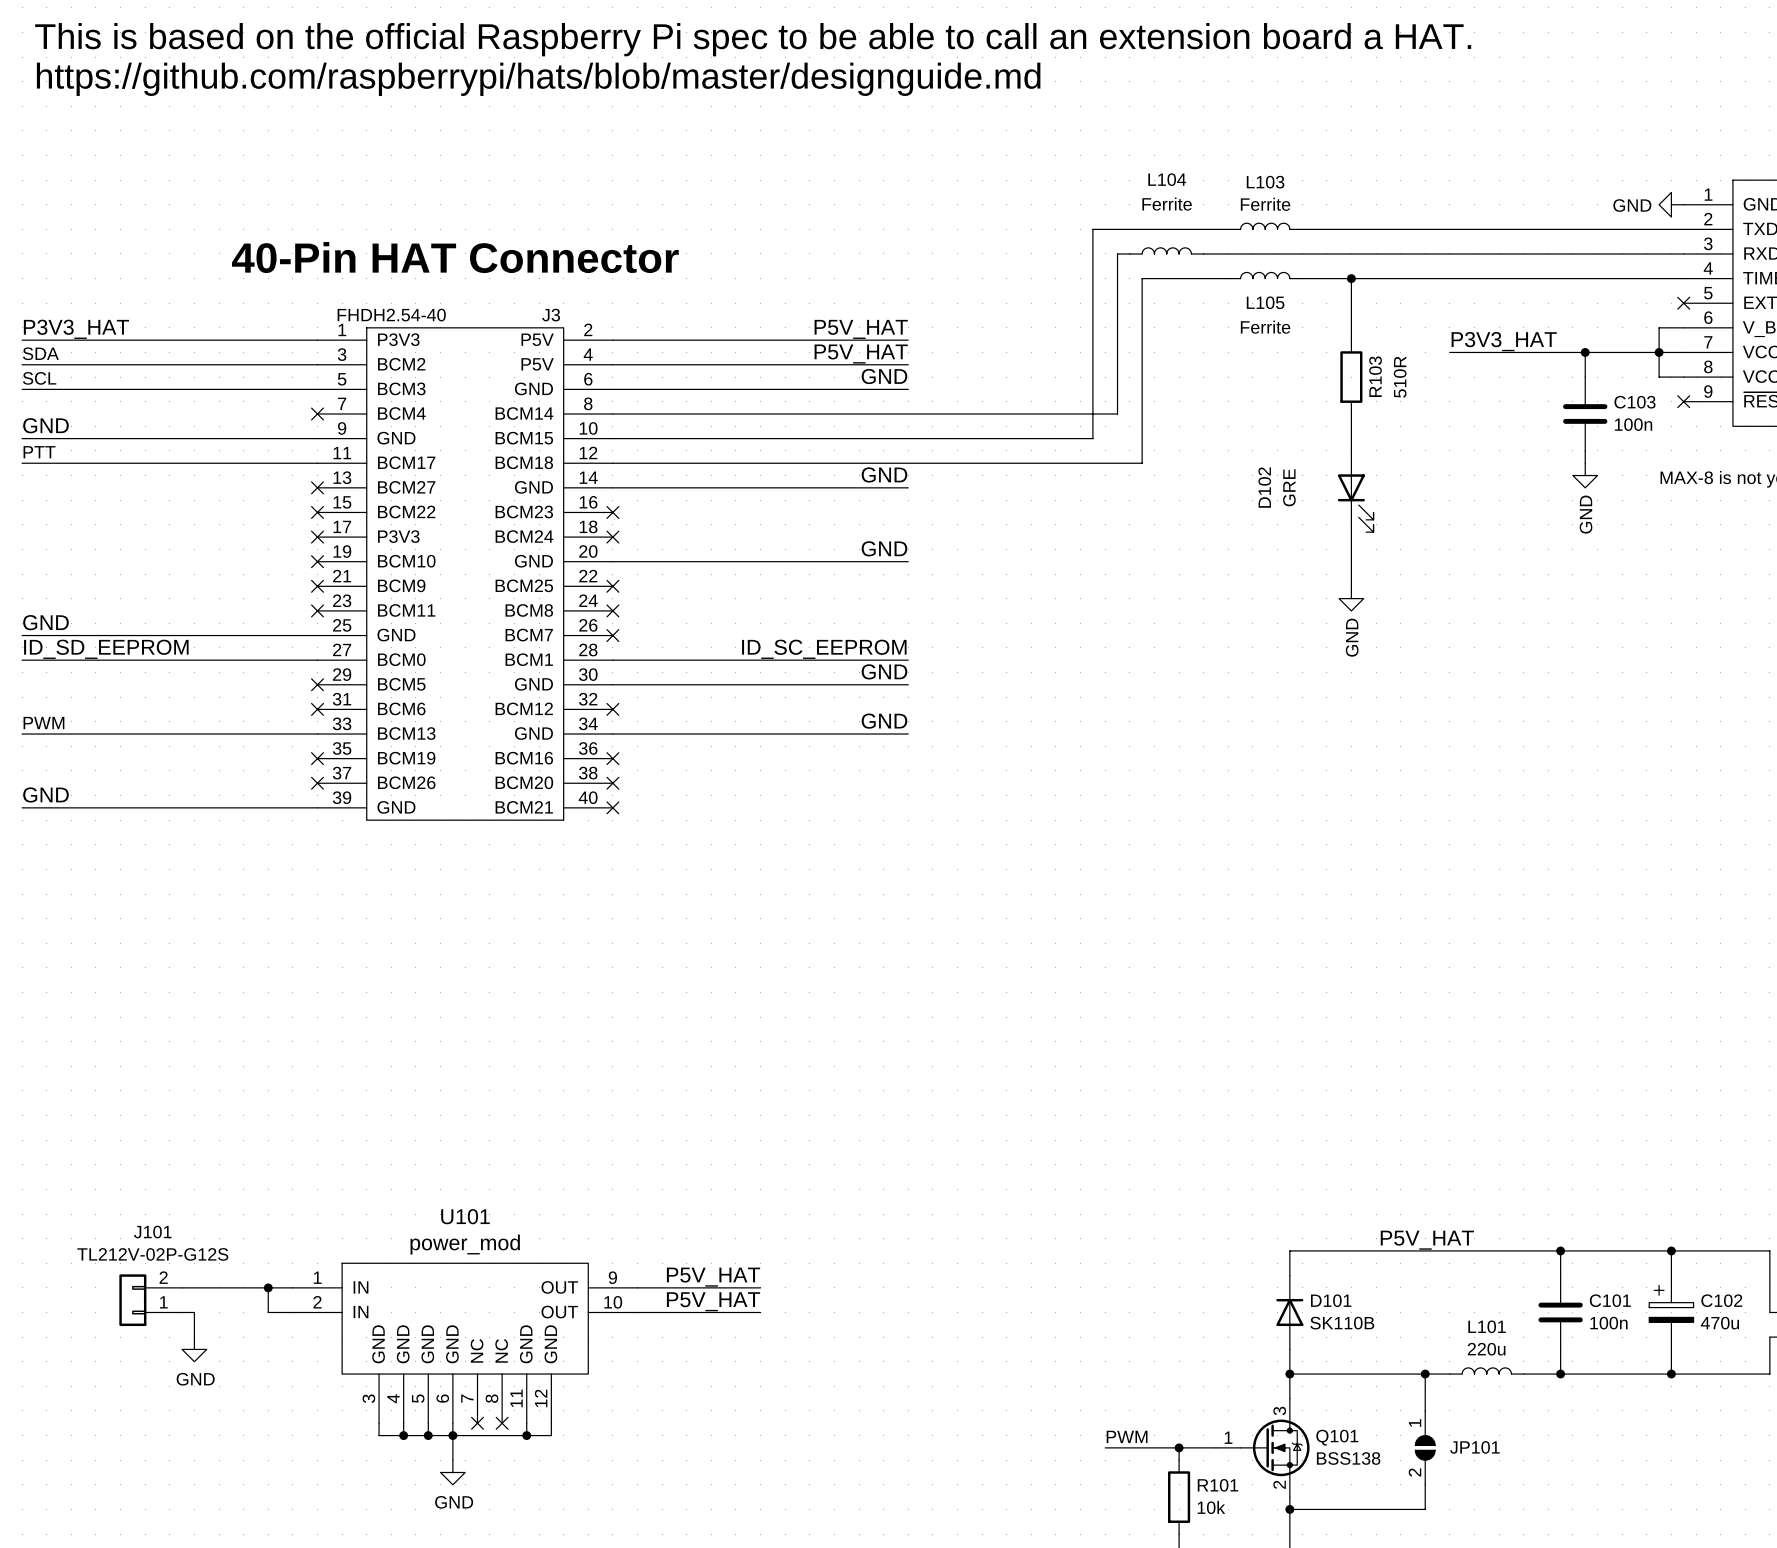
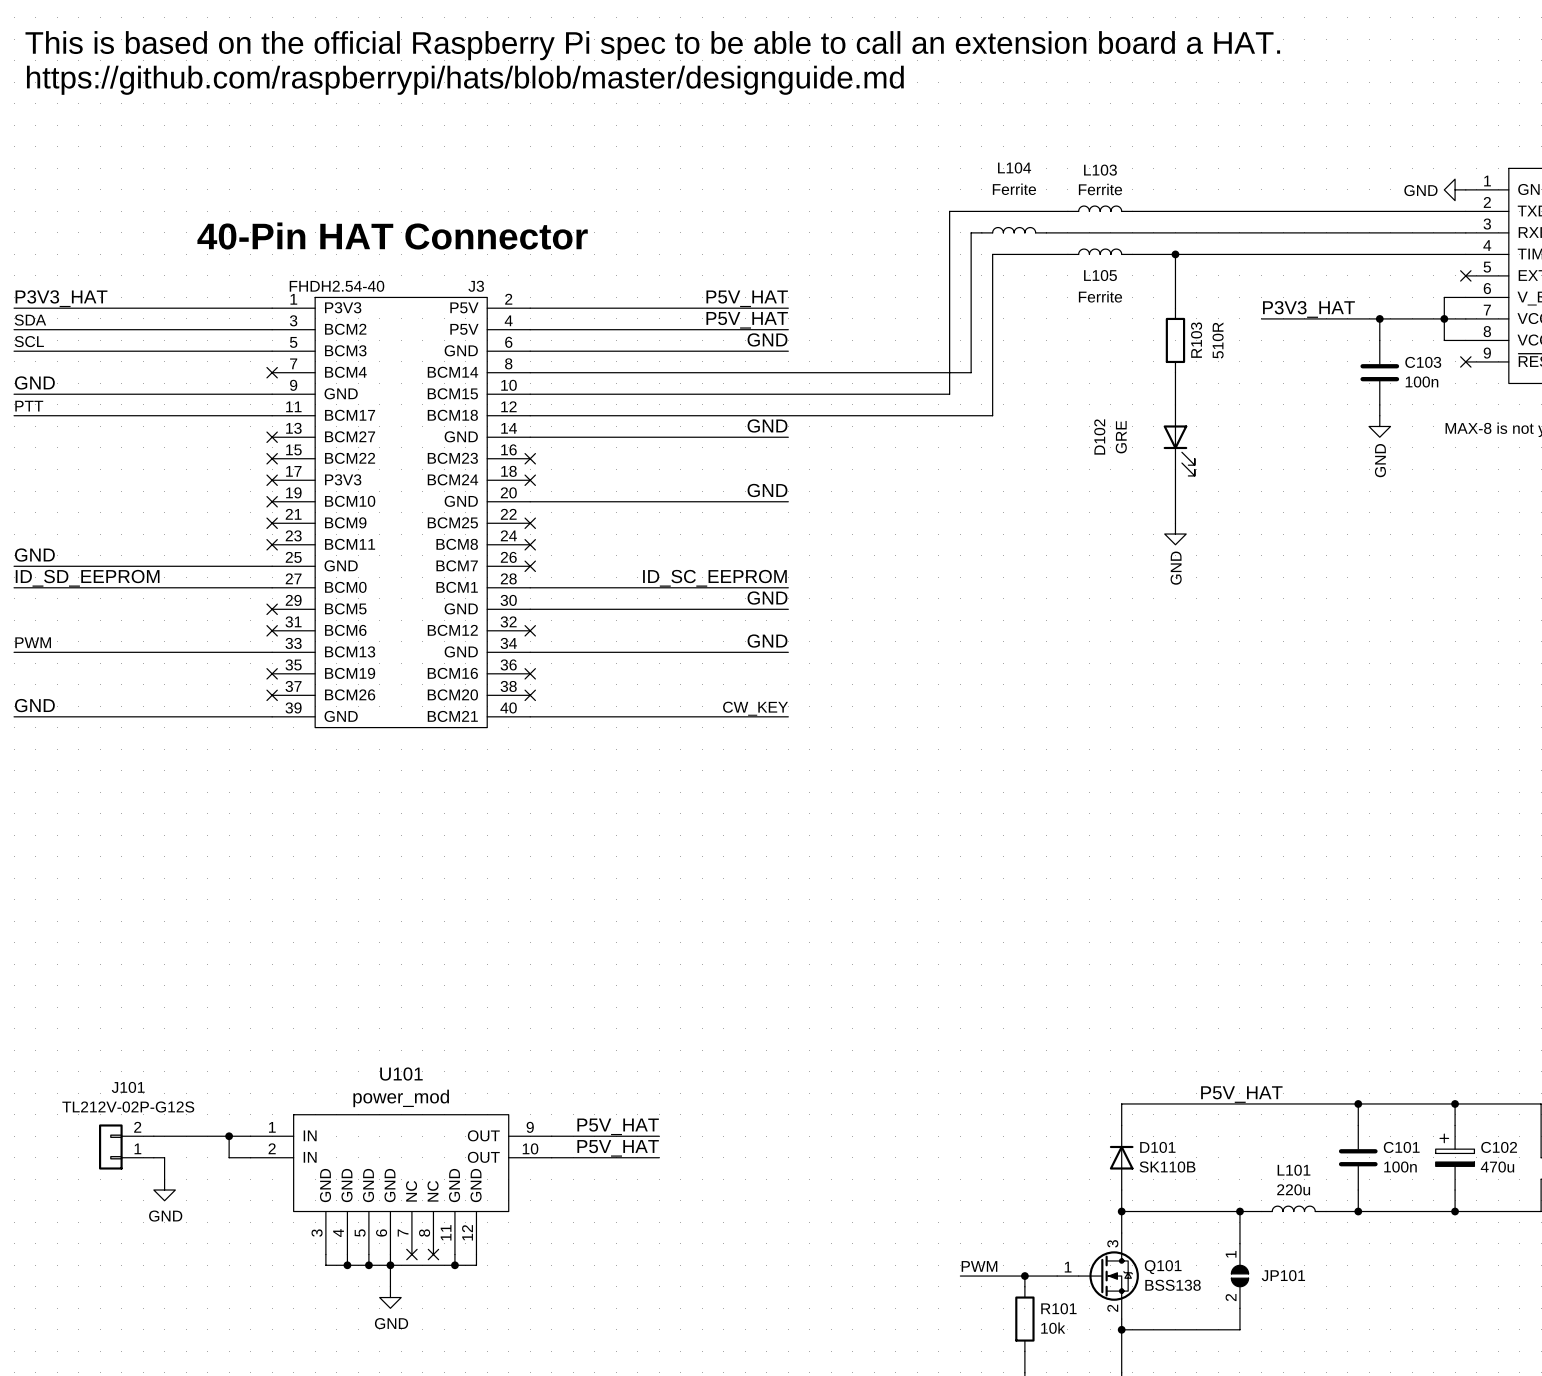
label: none -> CW_KEY (755, 708)
wire: none -> (530, 716) (788, 716)
no-connect mark: (612, 807) -> none

